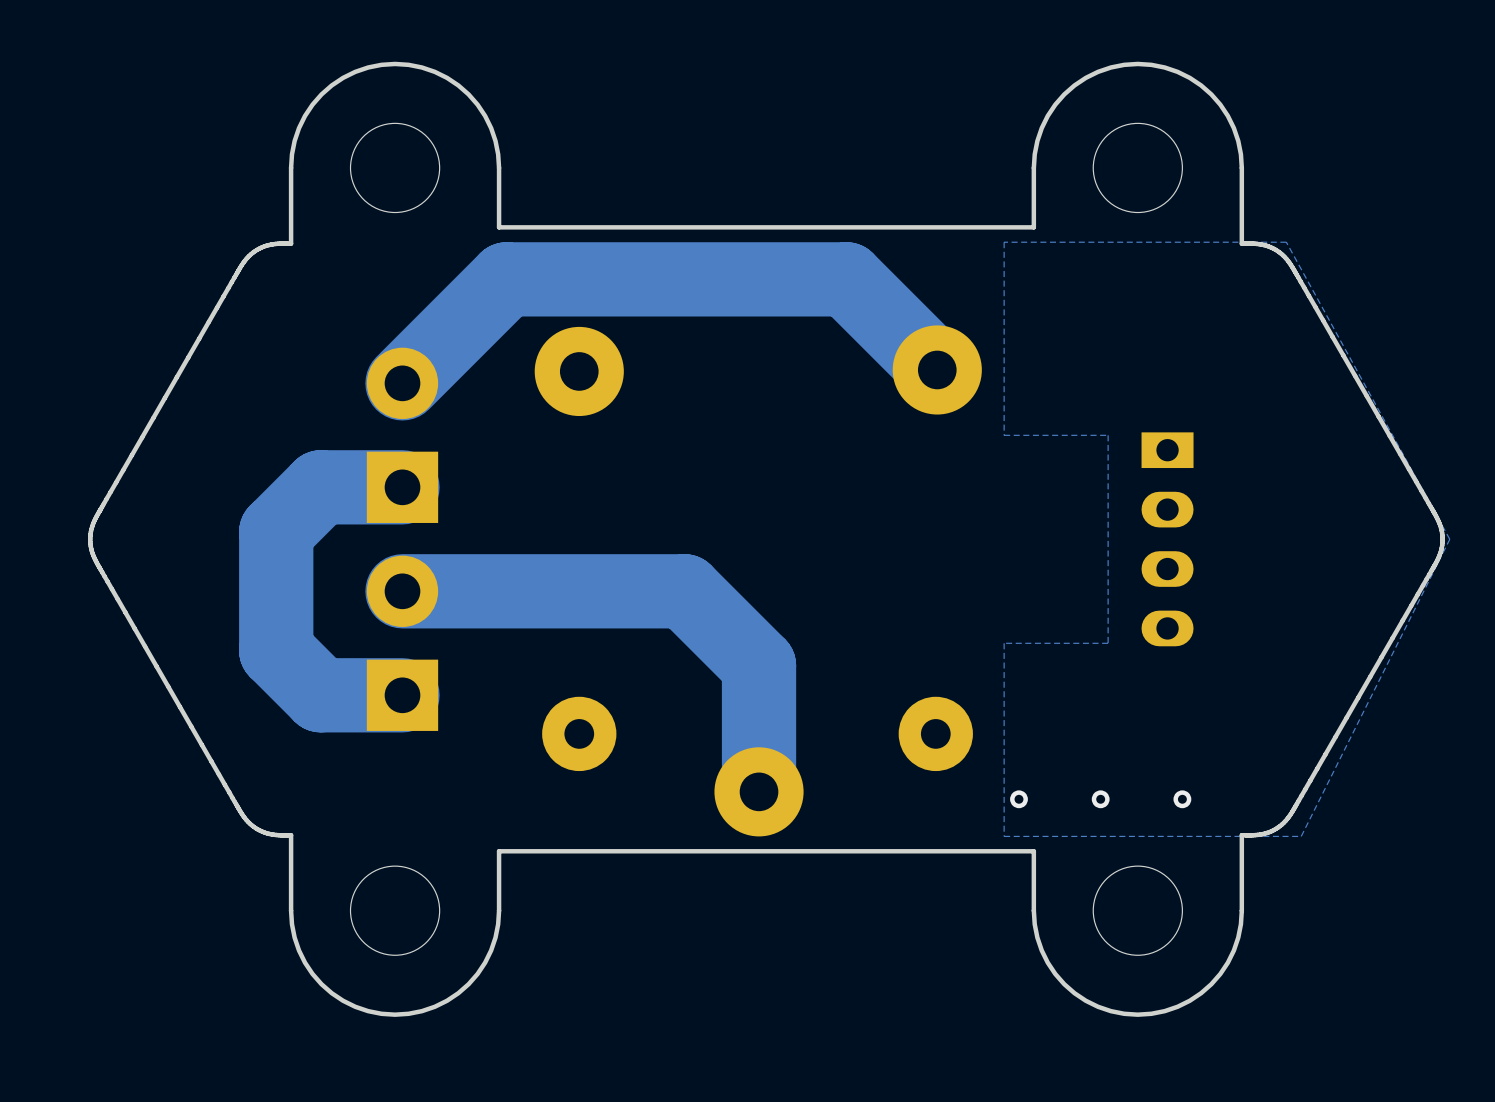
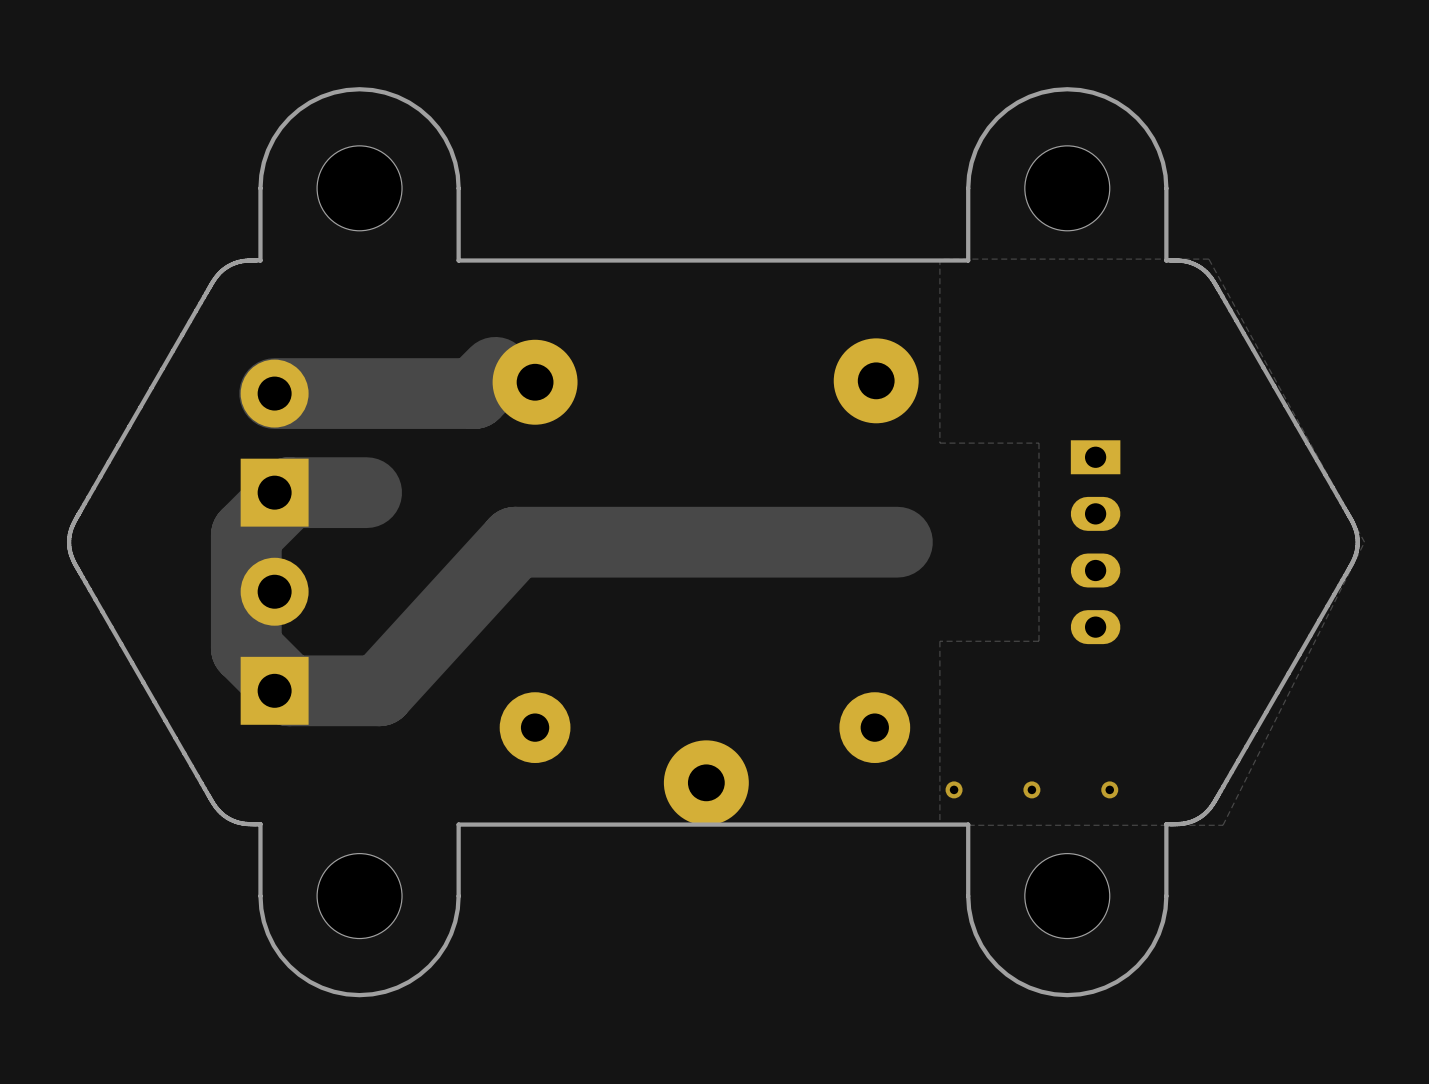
board edge: (1033, 227) (499, 227) -> (968, 244) (968, 260) (458, 260) (458, 244)
track: none -> (495, 372) (474, 393) (274, 393)
track: (937, 369) (846, 279) (506, 279) (402, 383) -> none
part position: (402, 435) -> (274, 443)
track: none -> (897, 542) (515, 542) (379, 690) (366, 690)
track: (402, 591) (684, 591) (759, 665) (759, 791) -> none
part position: (402, 643) -> (274, 641)
board edge: (1033, 851) (499, 851) -> (968, 839) (968, 824) (458, 824) (458, 839)

